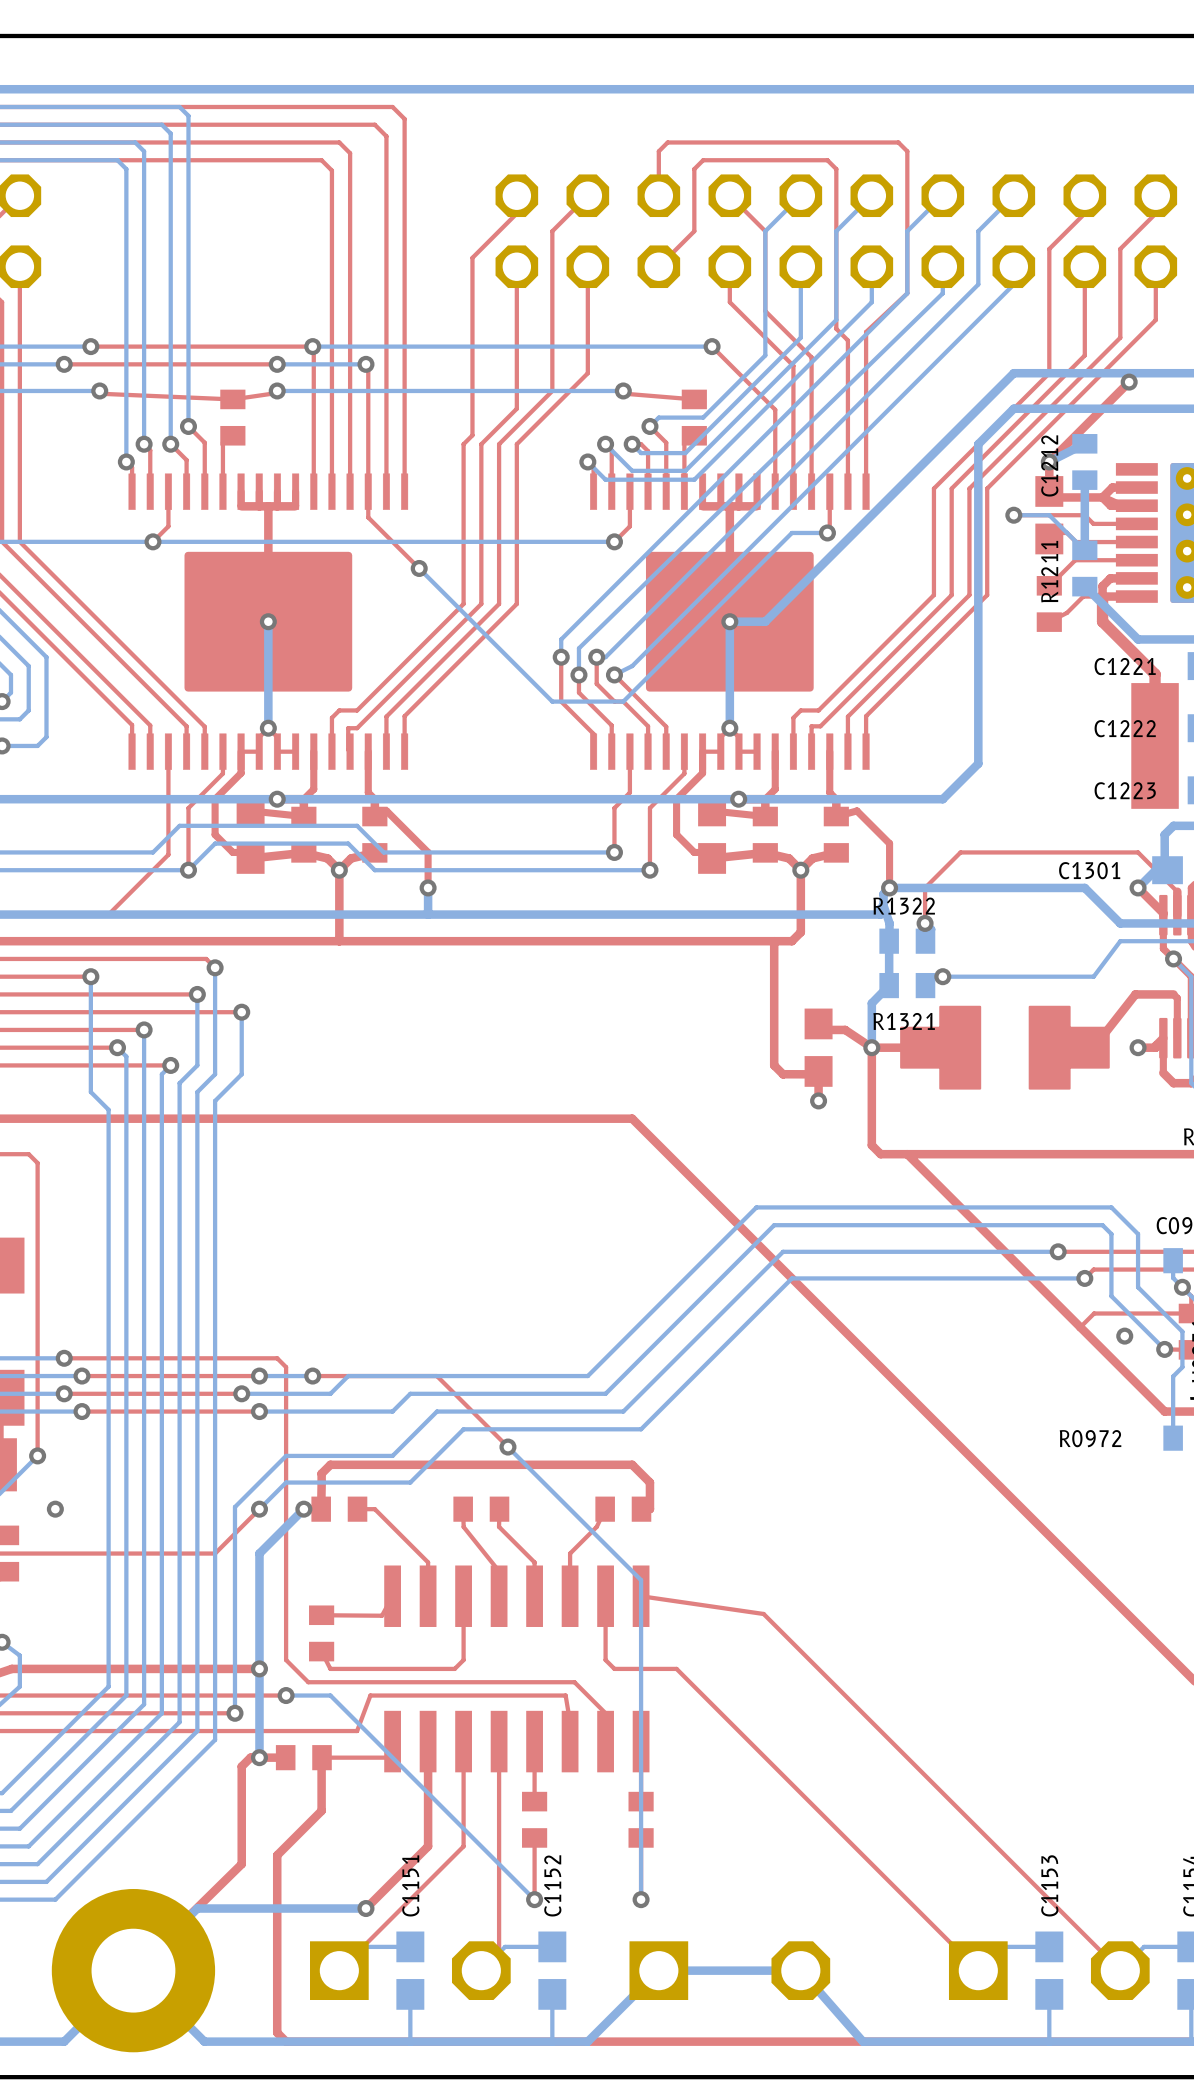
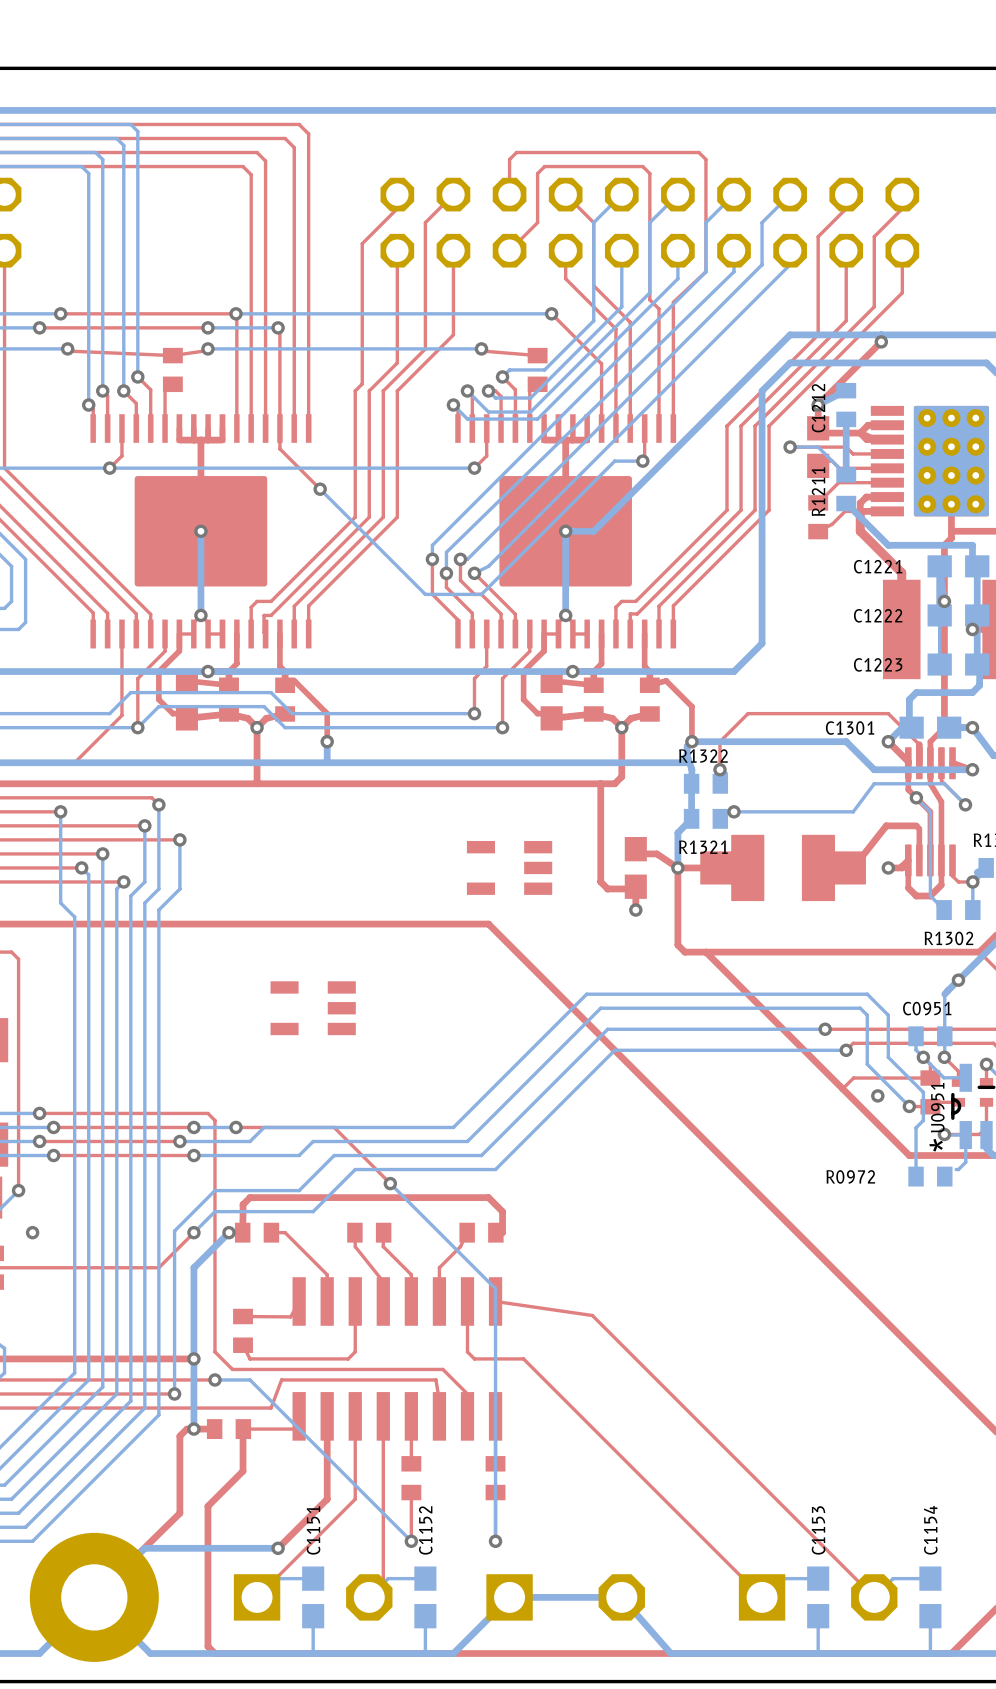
part: none -> (509, 867)
part: none -> (313, 1008)

